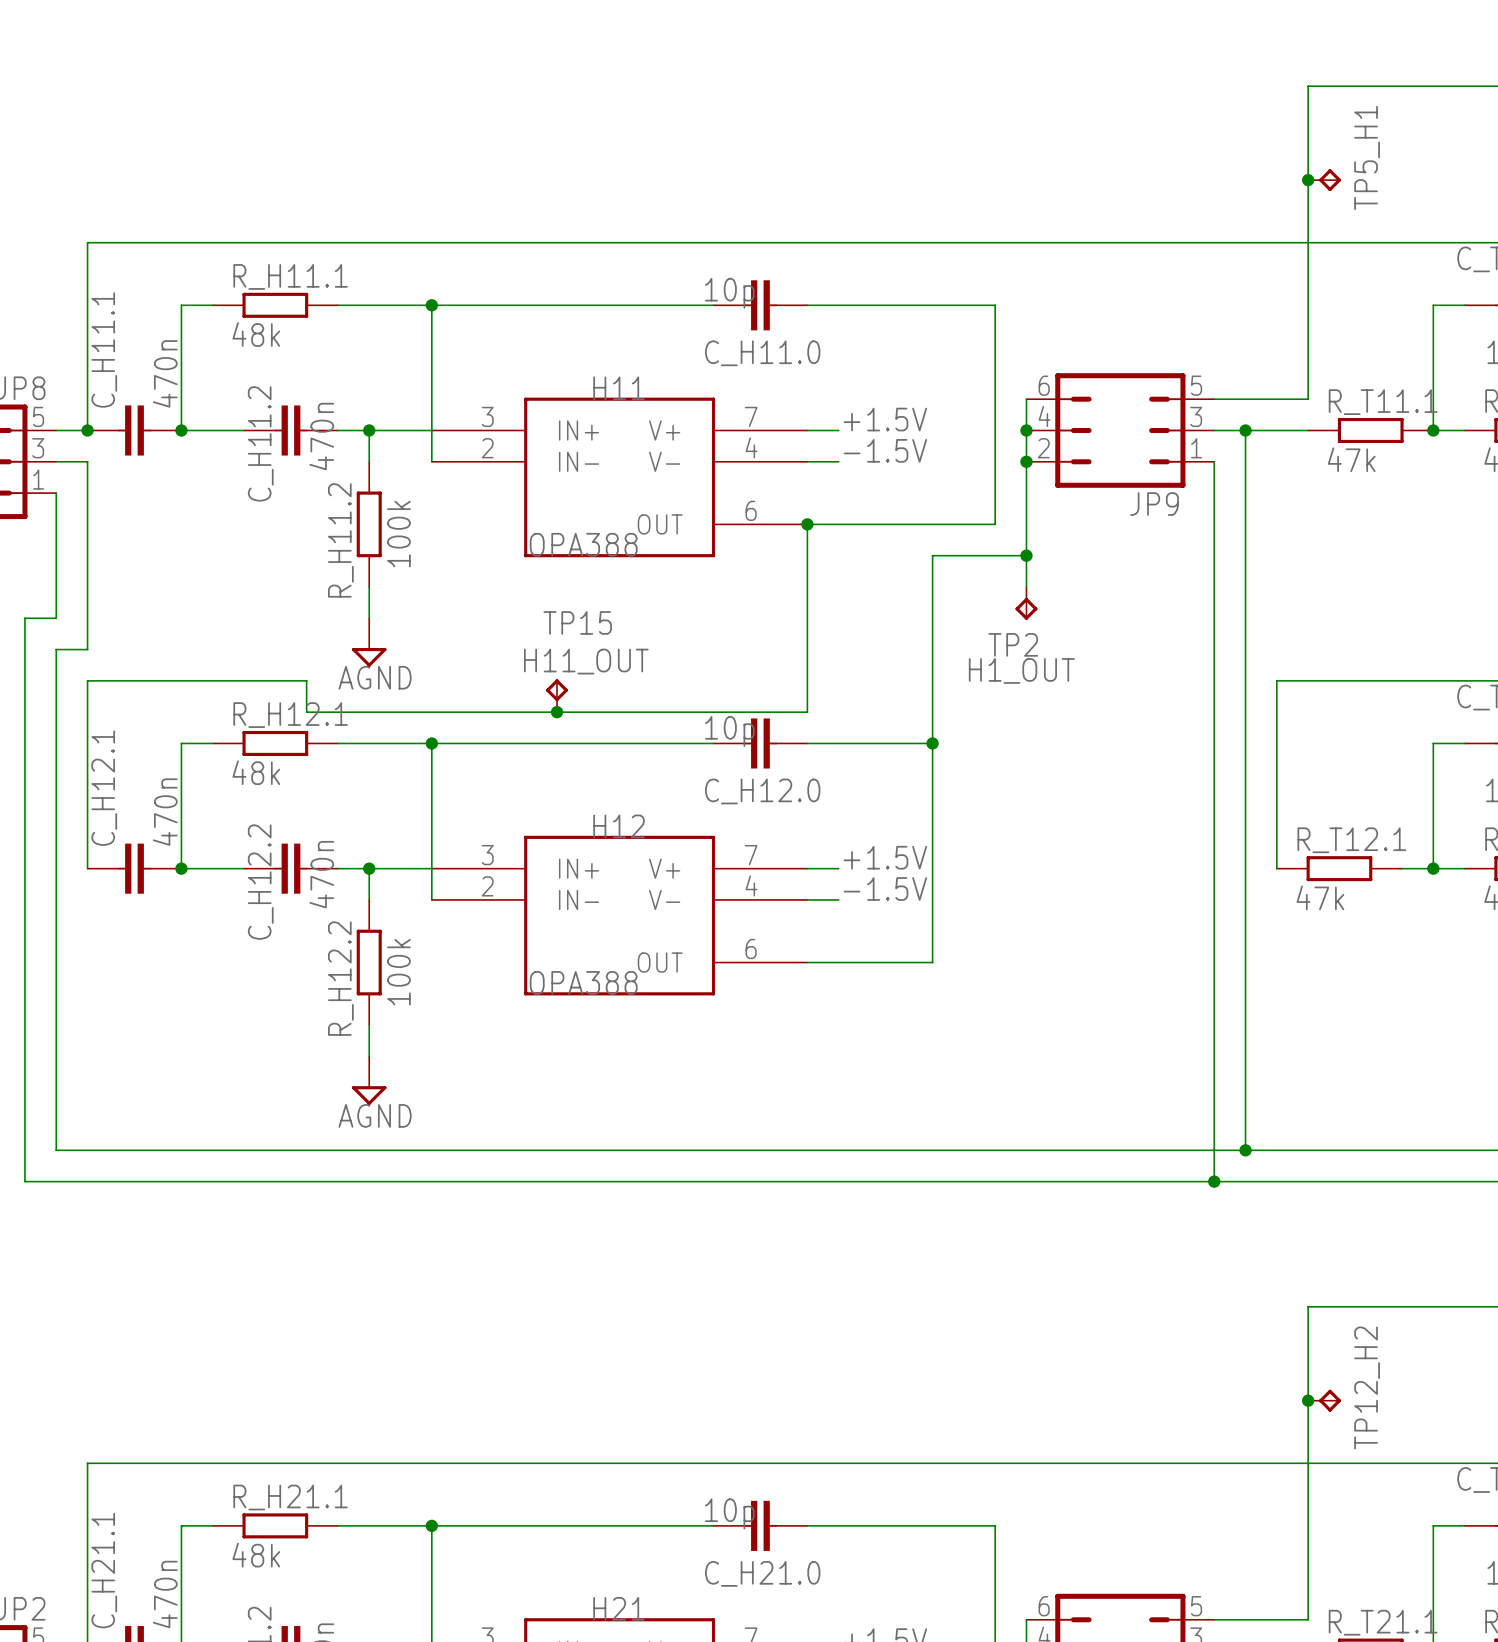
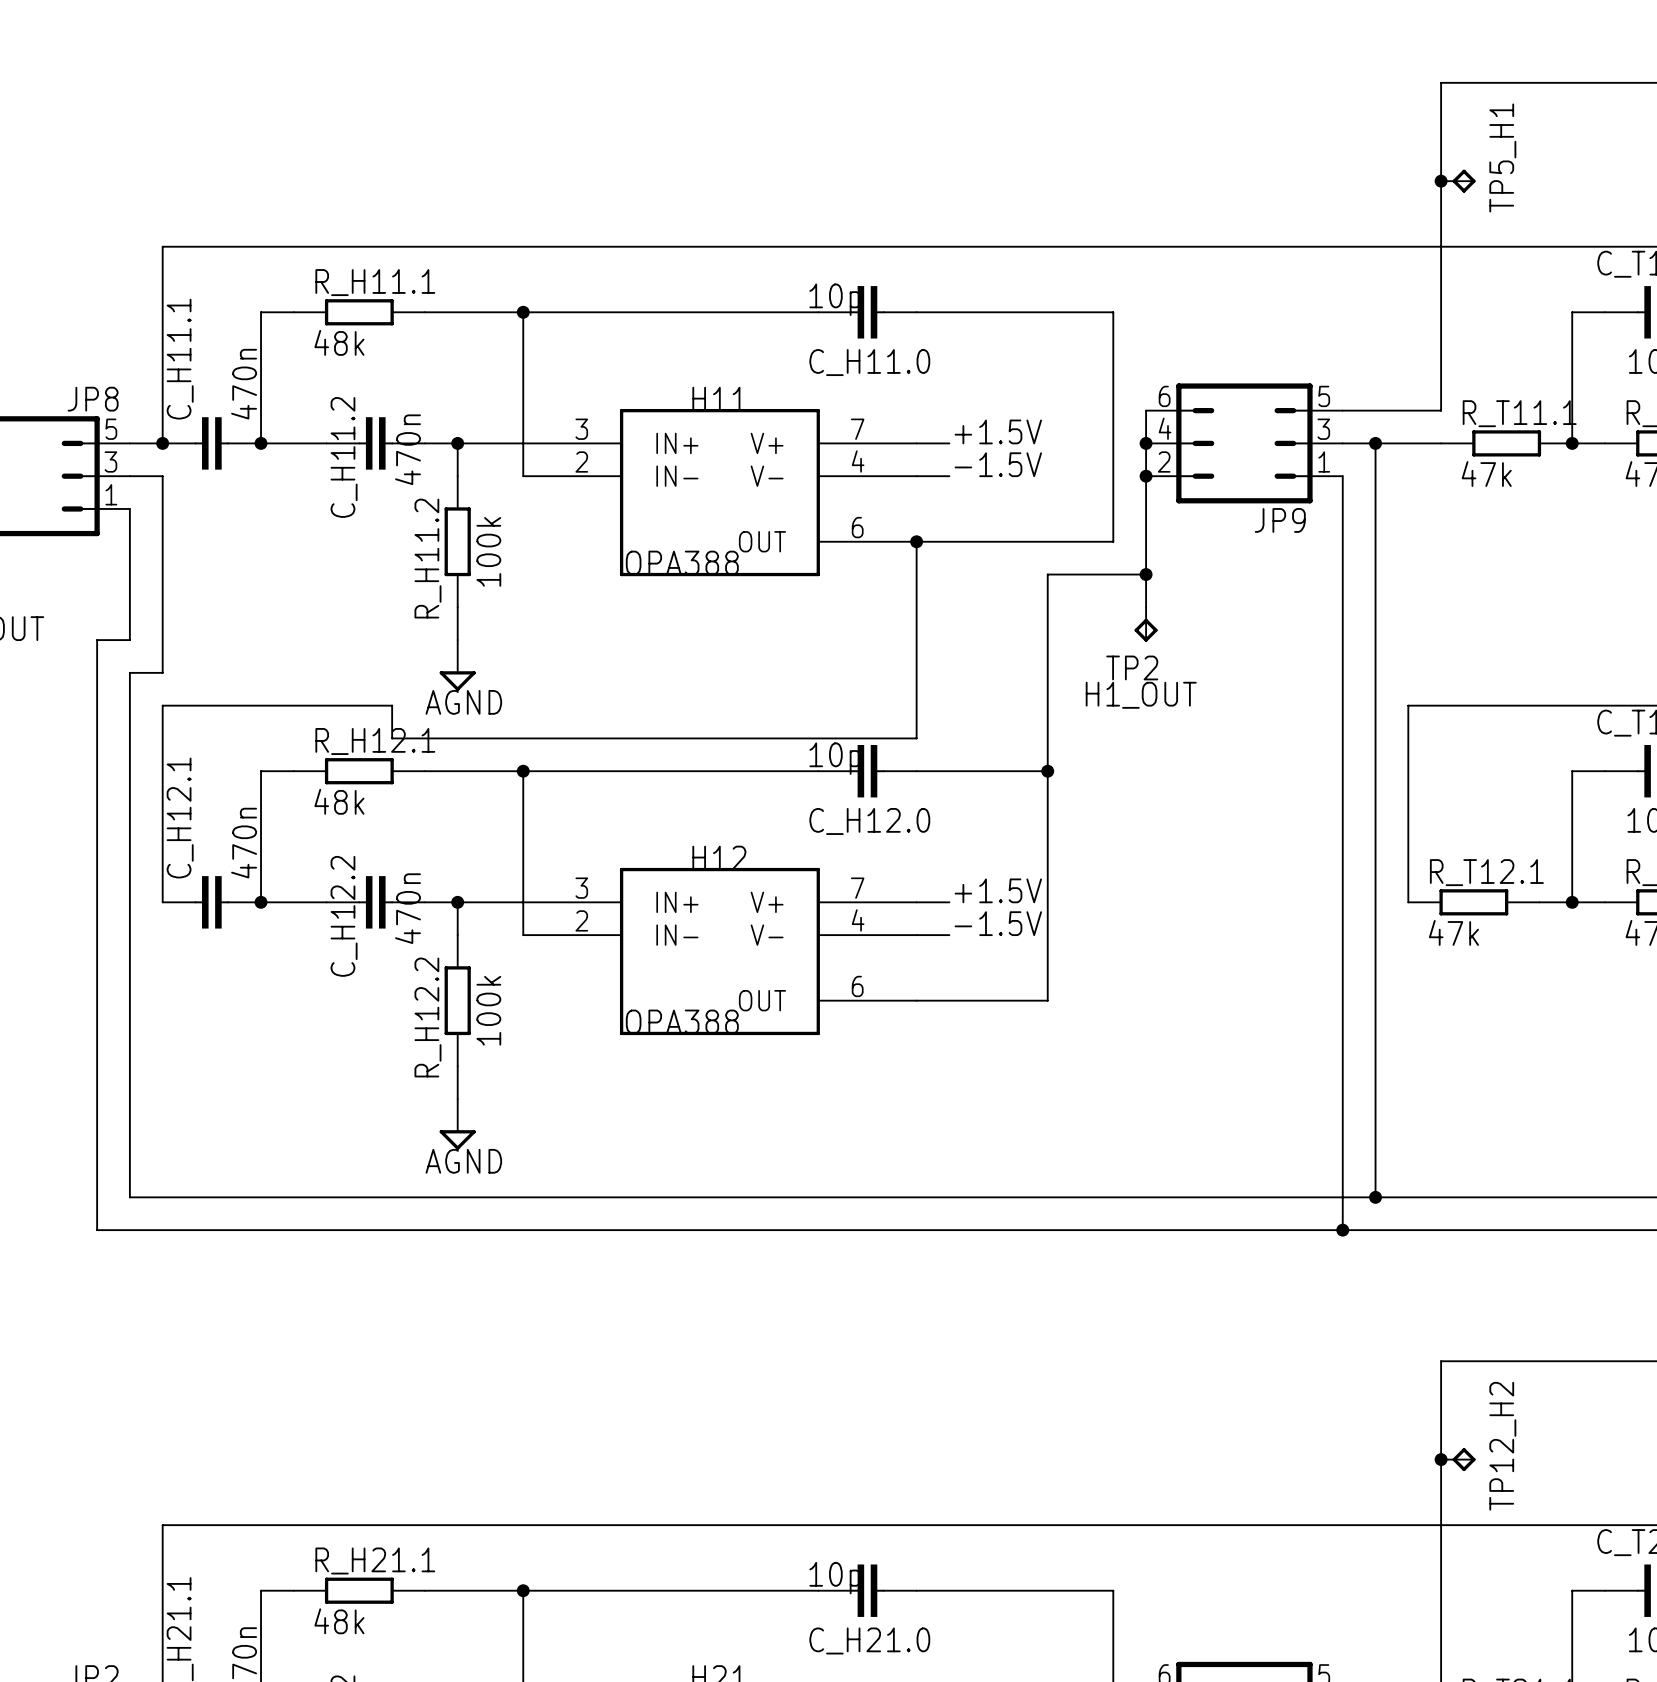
label: H11_OUT (586, 661) -> none
TP15: (557, 695) -> none
junction: (557, 712) -> none

